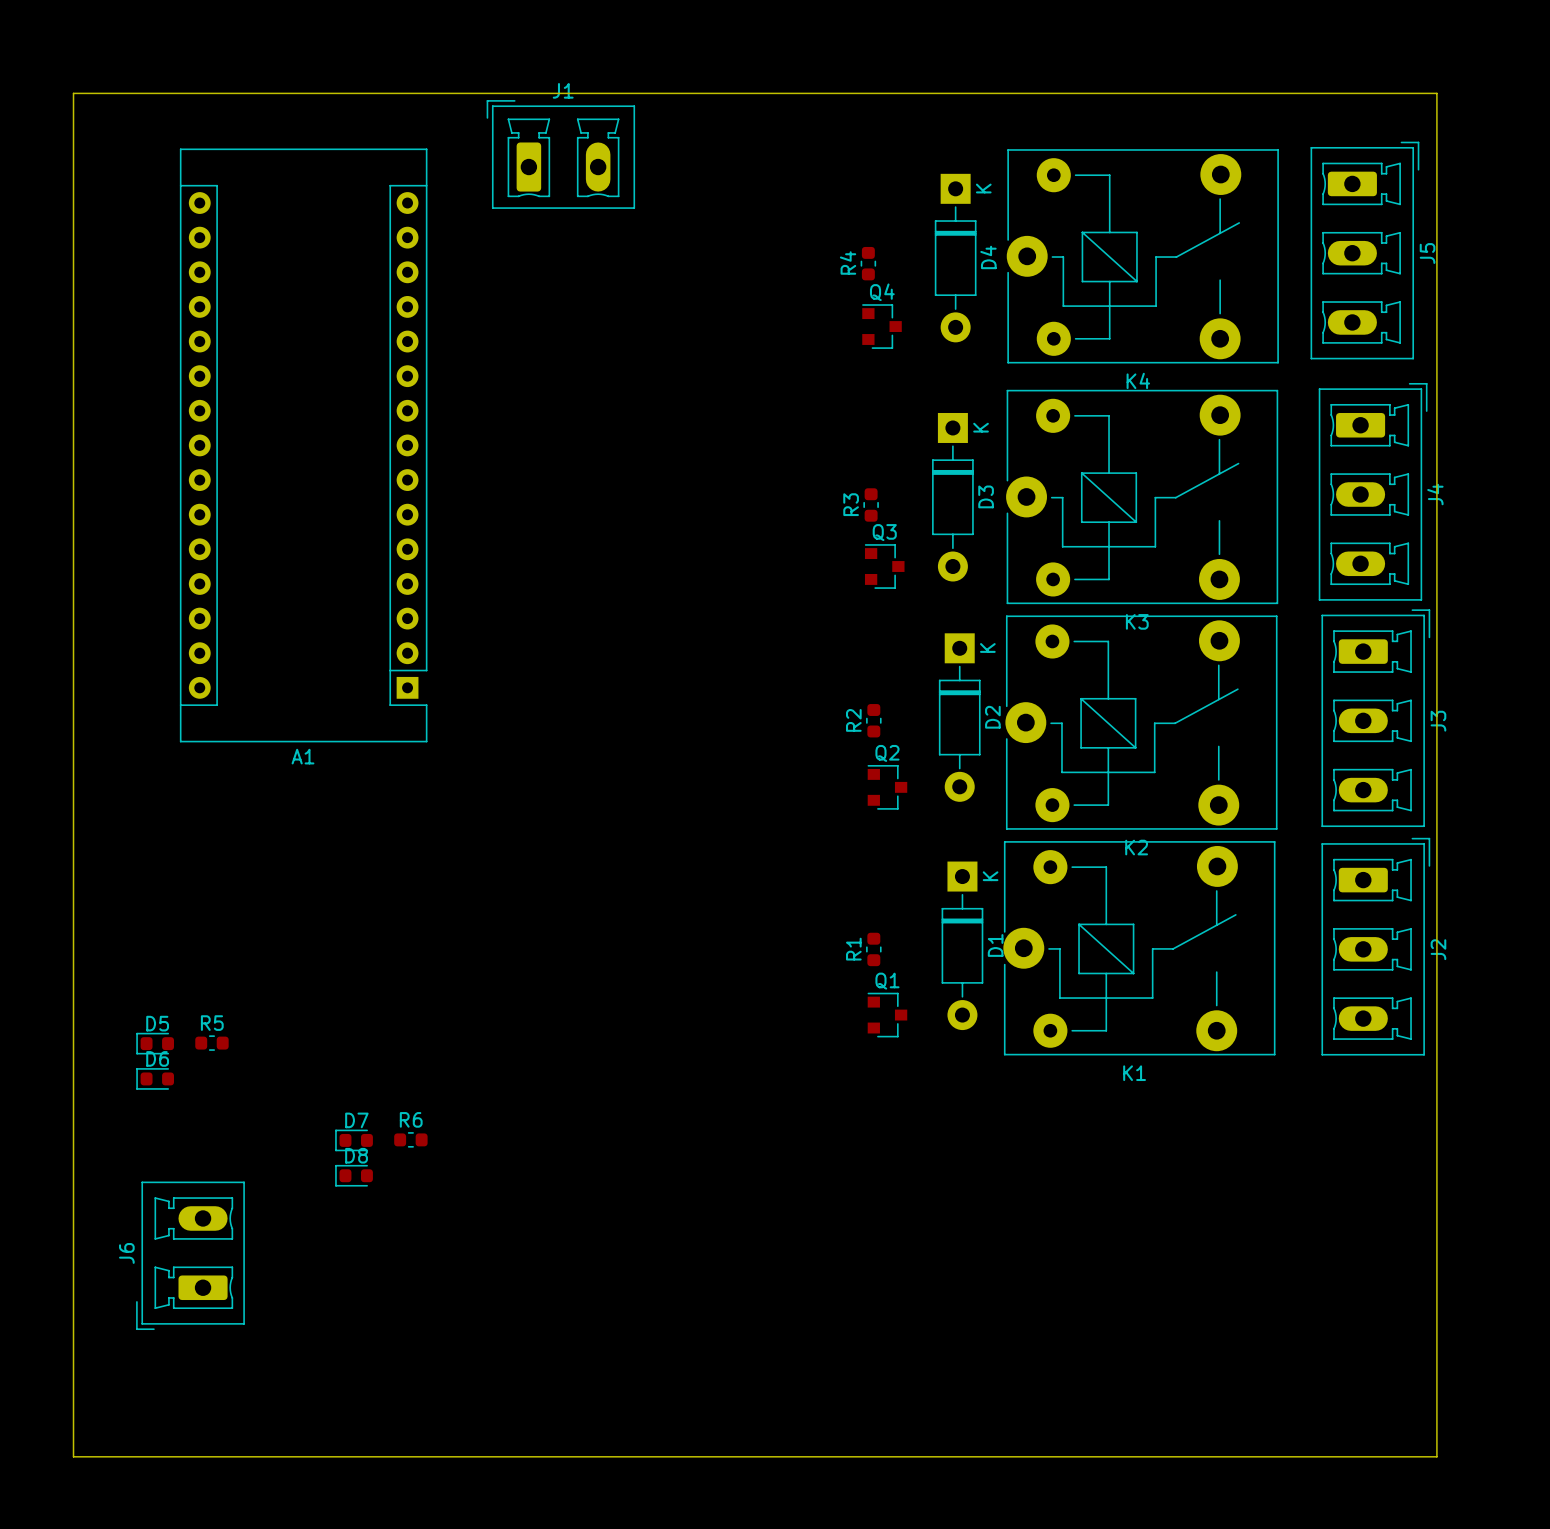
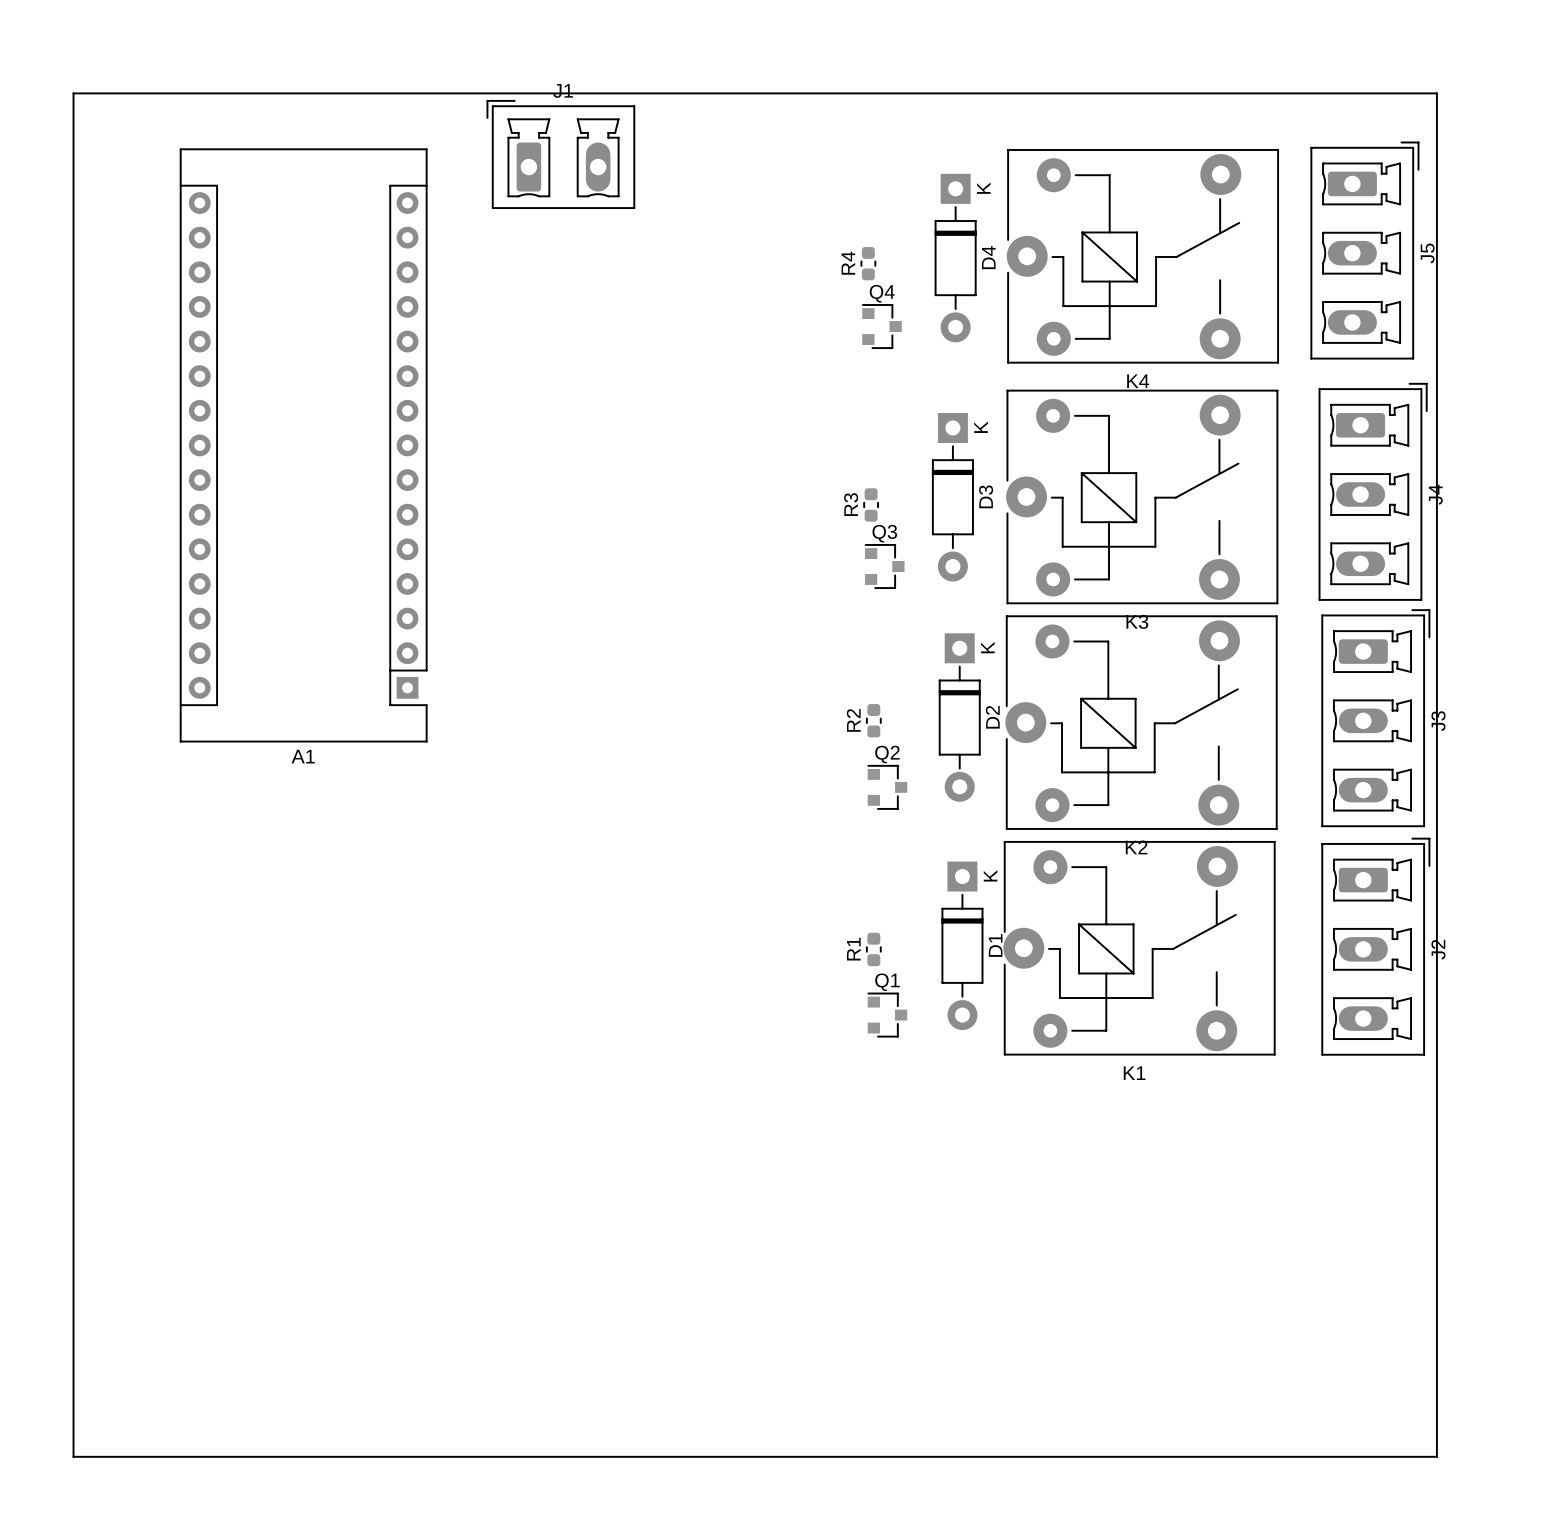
D5: (155, 1043) -> none
R5: (211, 1043) -> none
D6: (155, 1078) -> none
R6: (410, 1139) -> none
D7: (354, 1140) -> none
D8: (354, 1175) -> none
J6: (190, 1255) -> none

